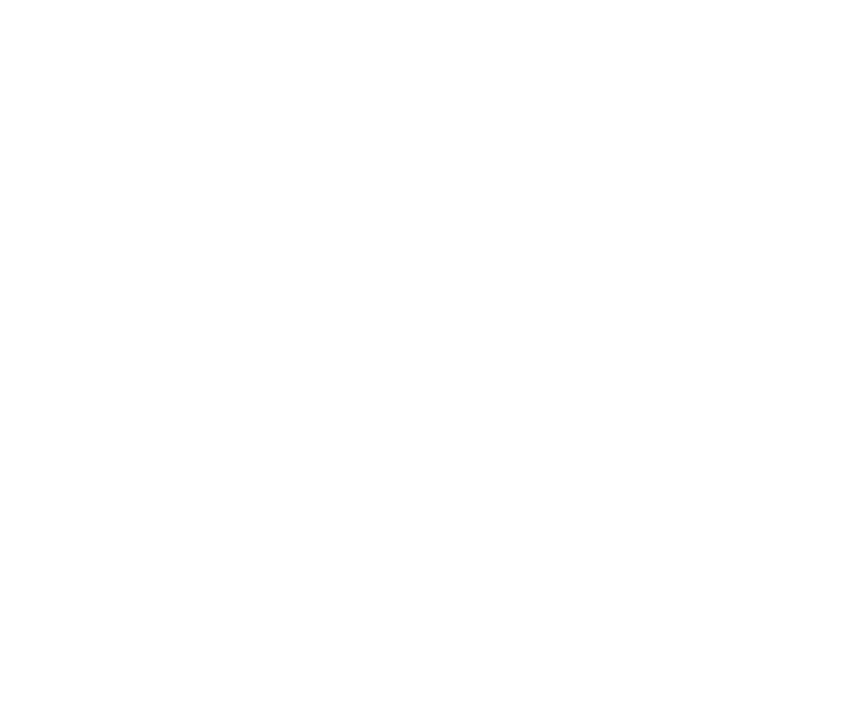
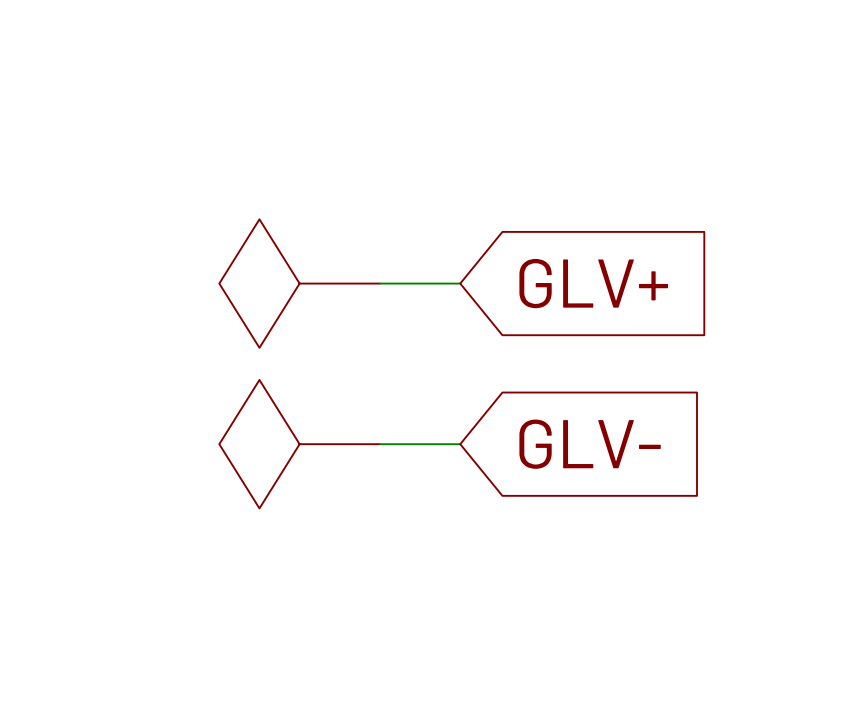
power symbol: none -> (299, 283)
wire: none -> (379, 283) (460, 283)
global label: none -> GLV+ (593, 283)
power symbol: none -> (299, 444)
wire: none -> (379, 444) (460, 444)
global label: none -> GLV- (590, 444)

